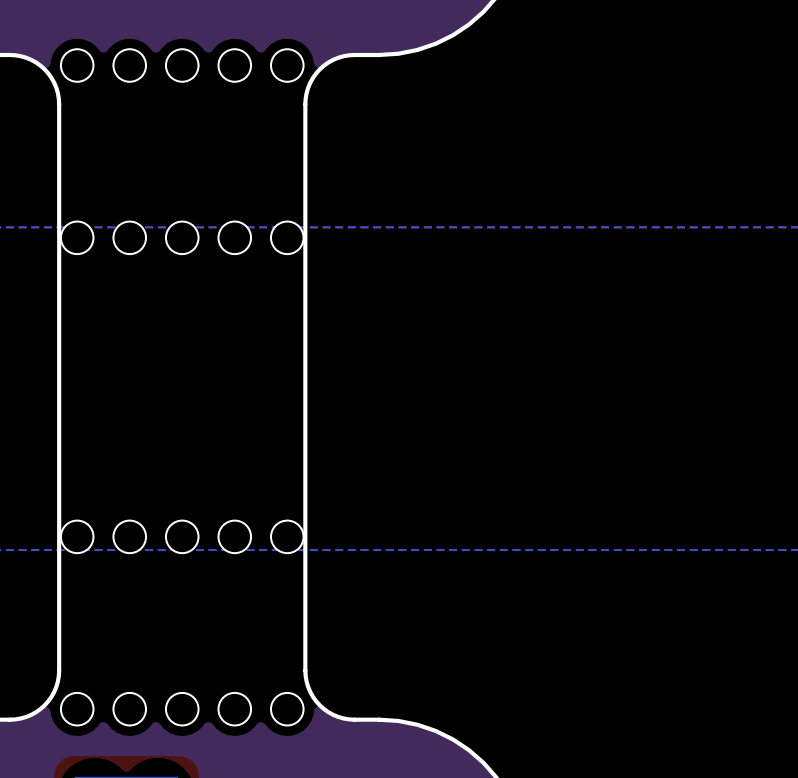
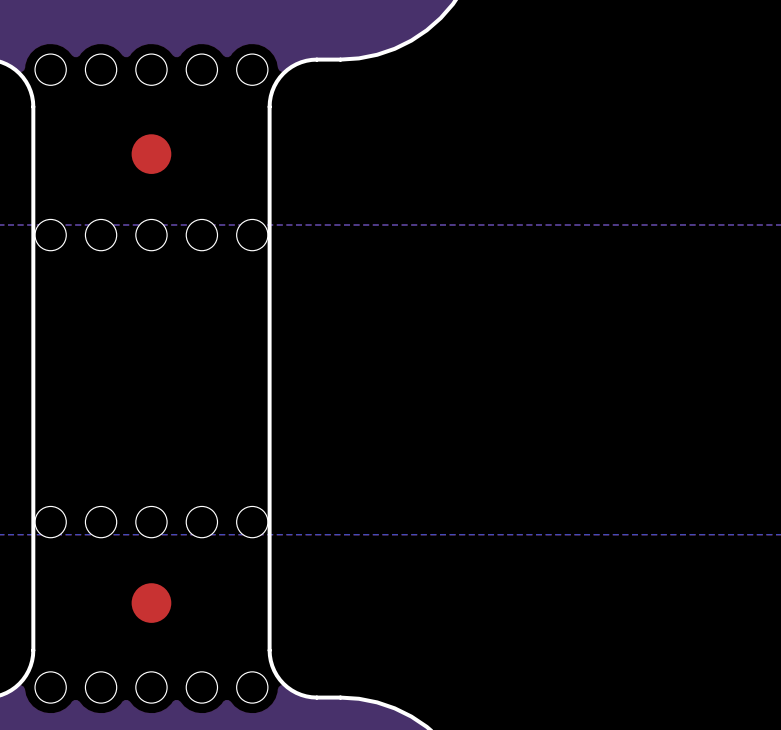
part: none -> (151, 154)
part: none -> (151, 603)

